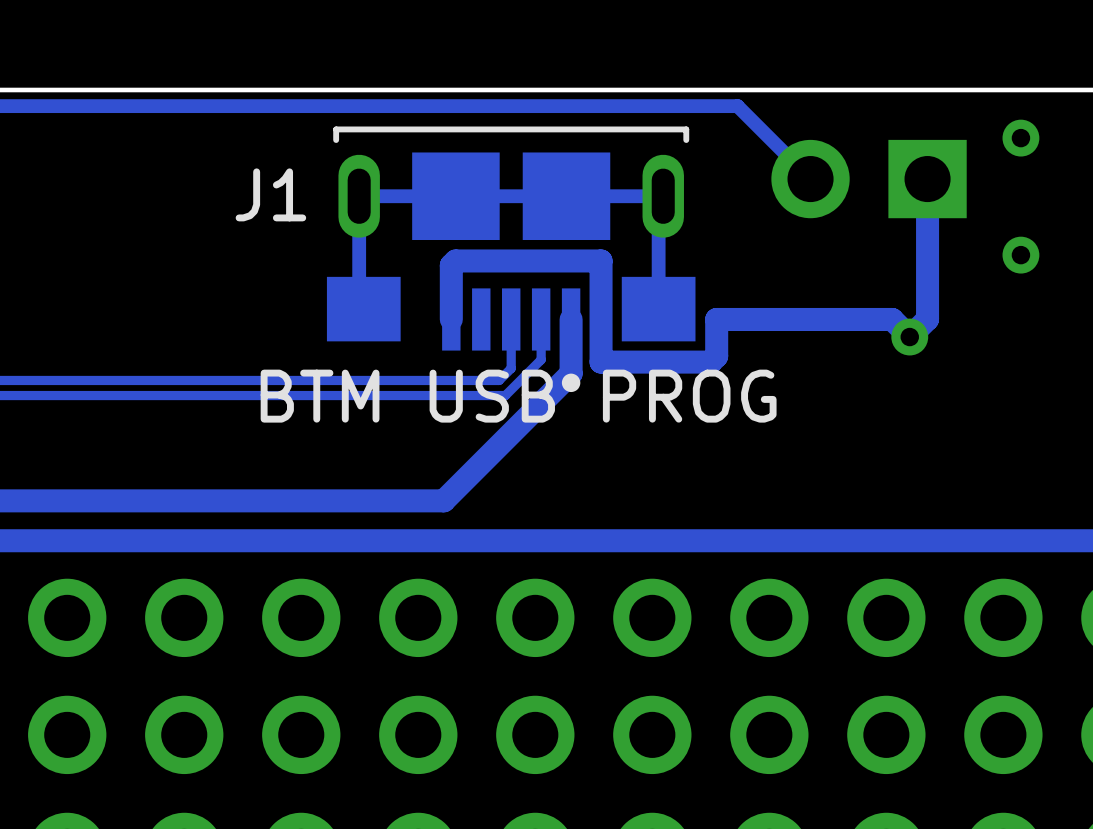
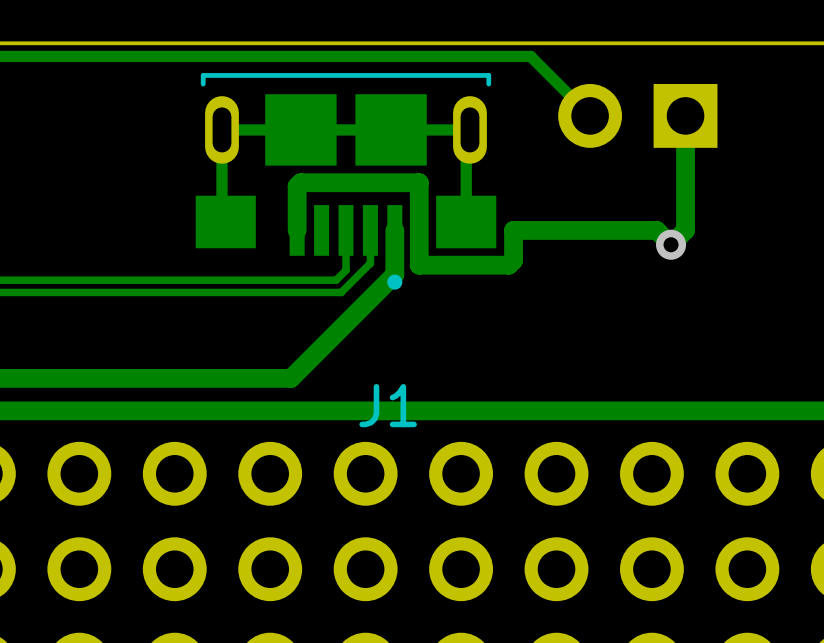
via: (1020, 138) -> none
J1 name position: J1 (270, 194) -> J1 (388, 405)
via: (1020, 255) -> none
text: BTM USB PROG (518, 396) -> none

